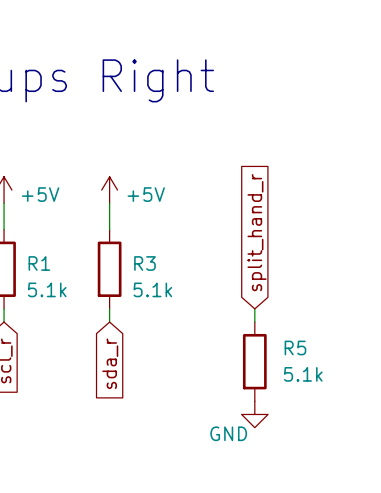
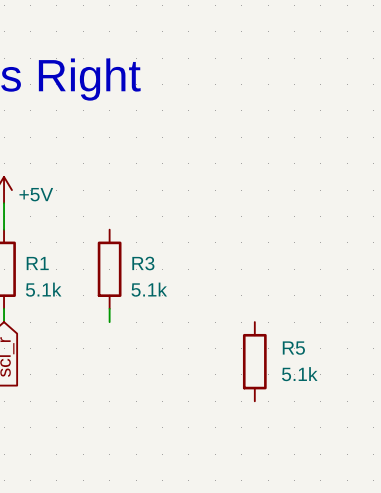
power symbol: +5V (109, 190) -> none
wire: (109, 203) (109, 229) -> none
global label: split_hand_r (257, 232) -> none
wire: (254, 308) (254, 322) -> none
global label: sda_r (110, 363) -> none
power symbol: GND (254, 414) -> none

